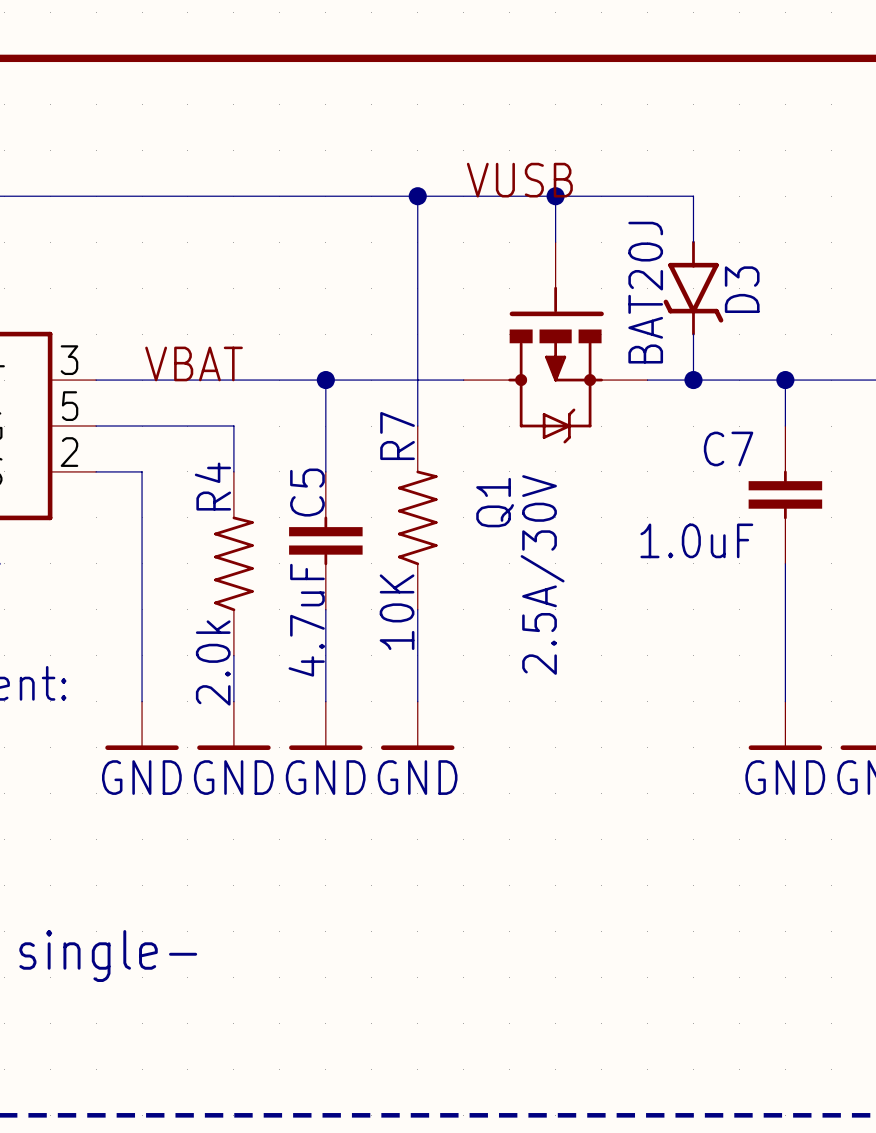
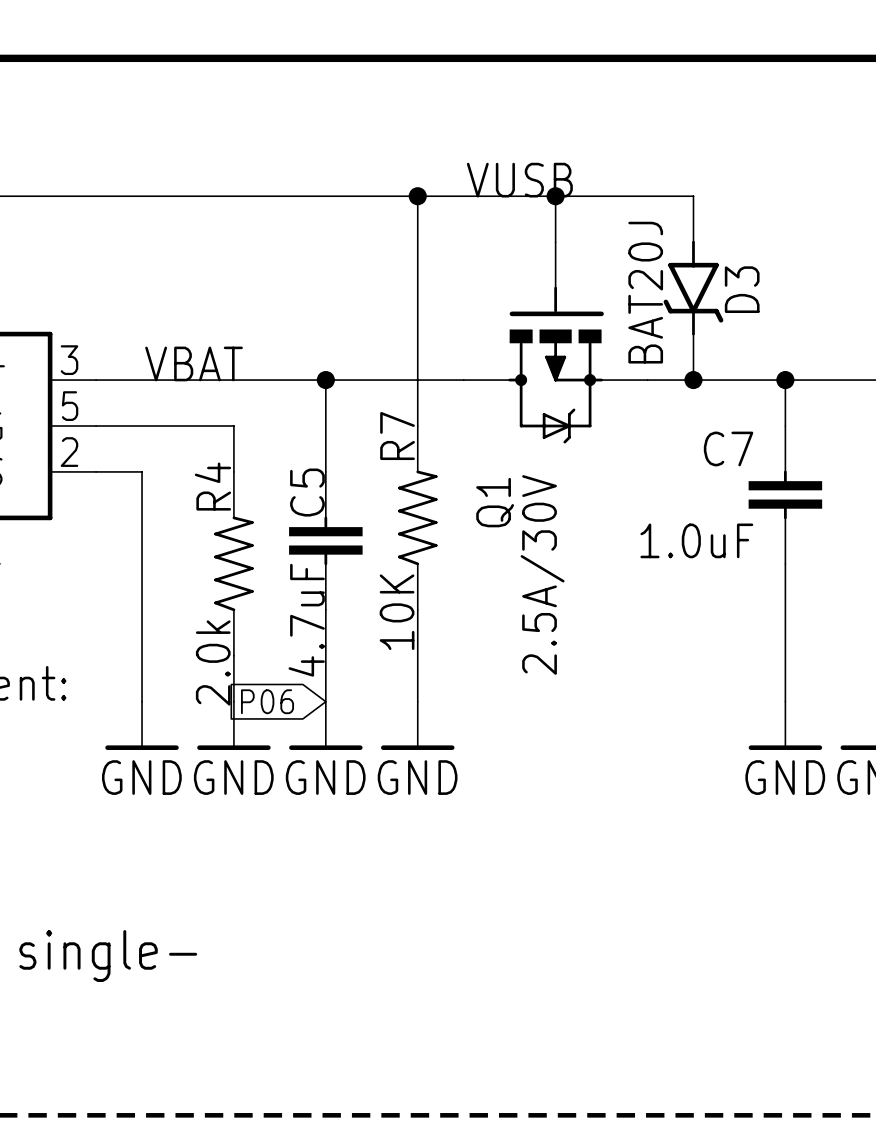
global label: none -> P06 (267, 701)

